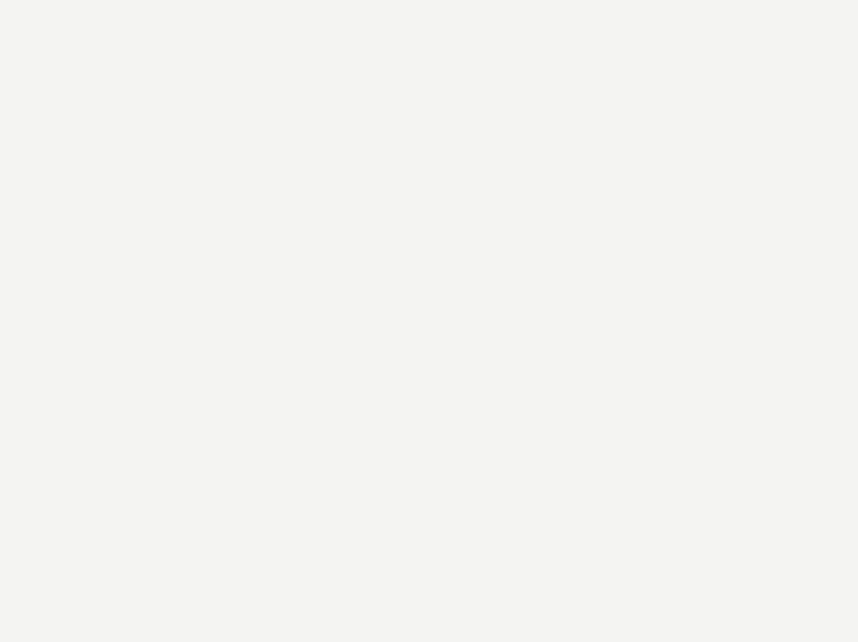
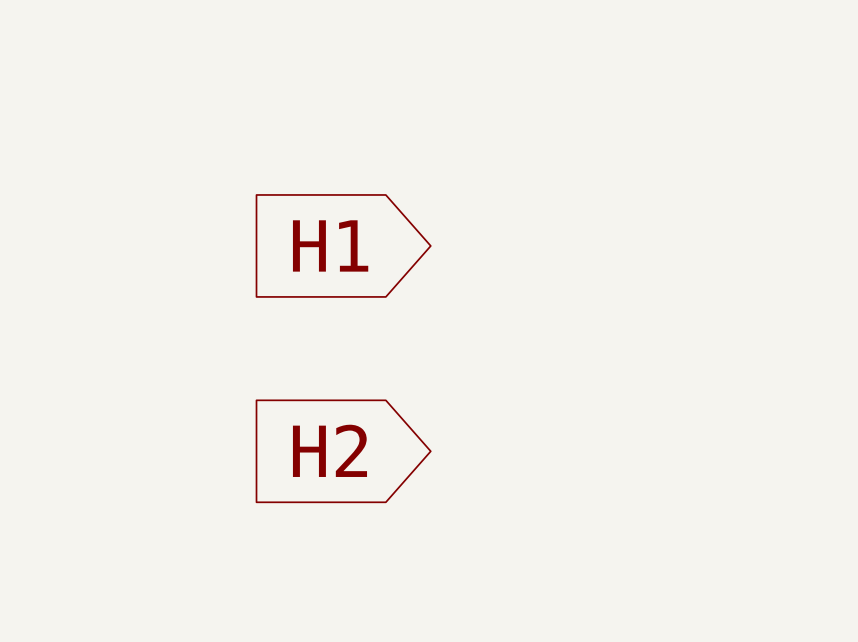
global label: none -> H1 (330, 245)
global label: none -> H2 (329, 450)

